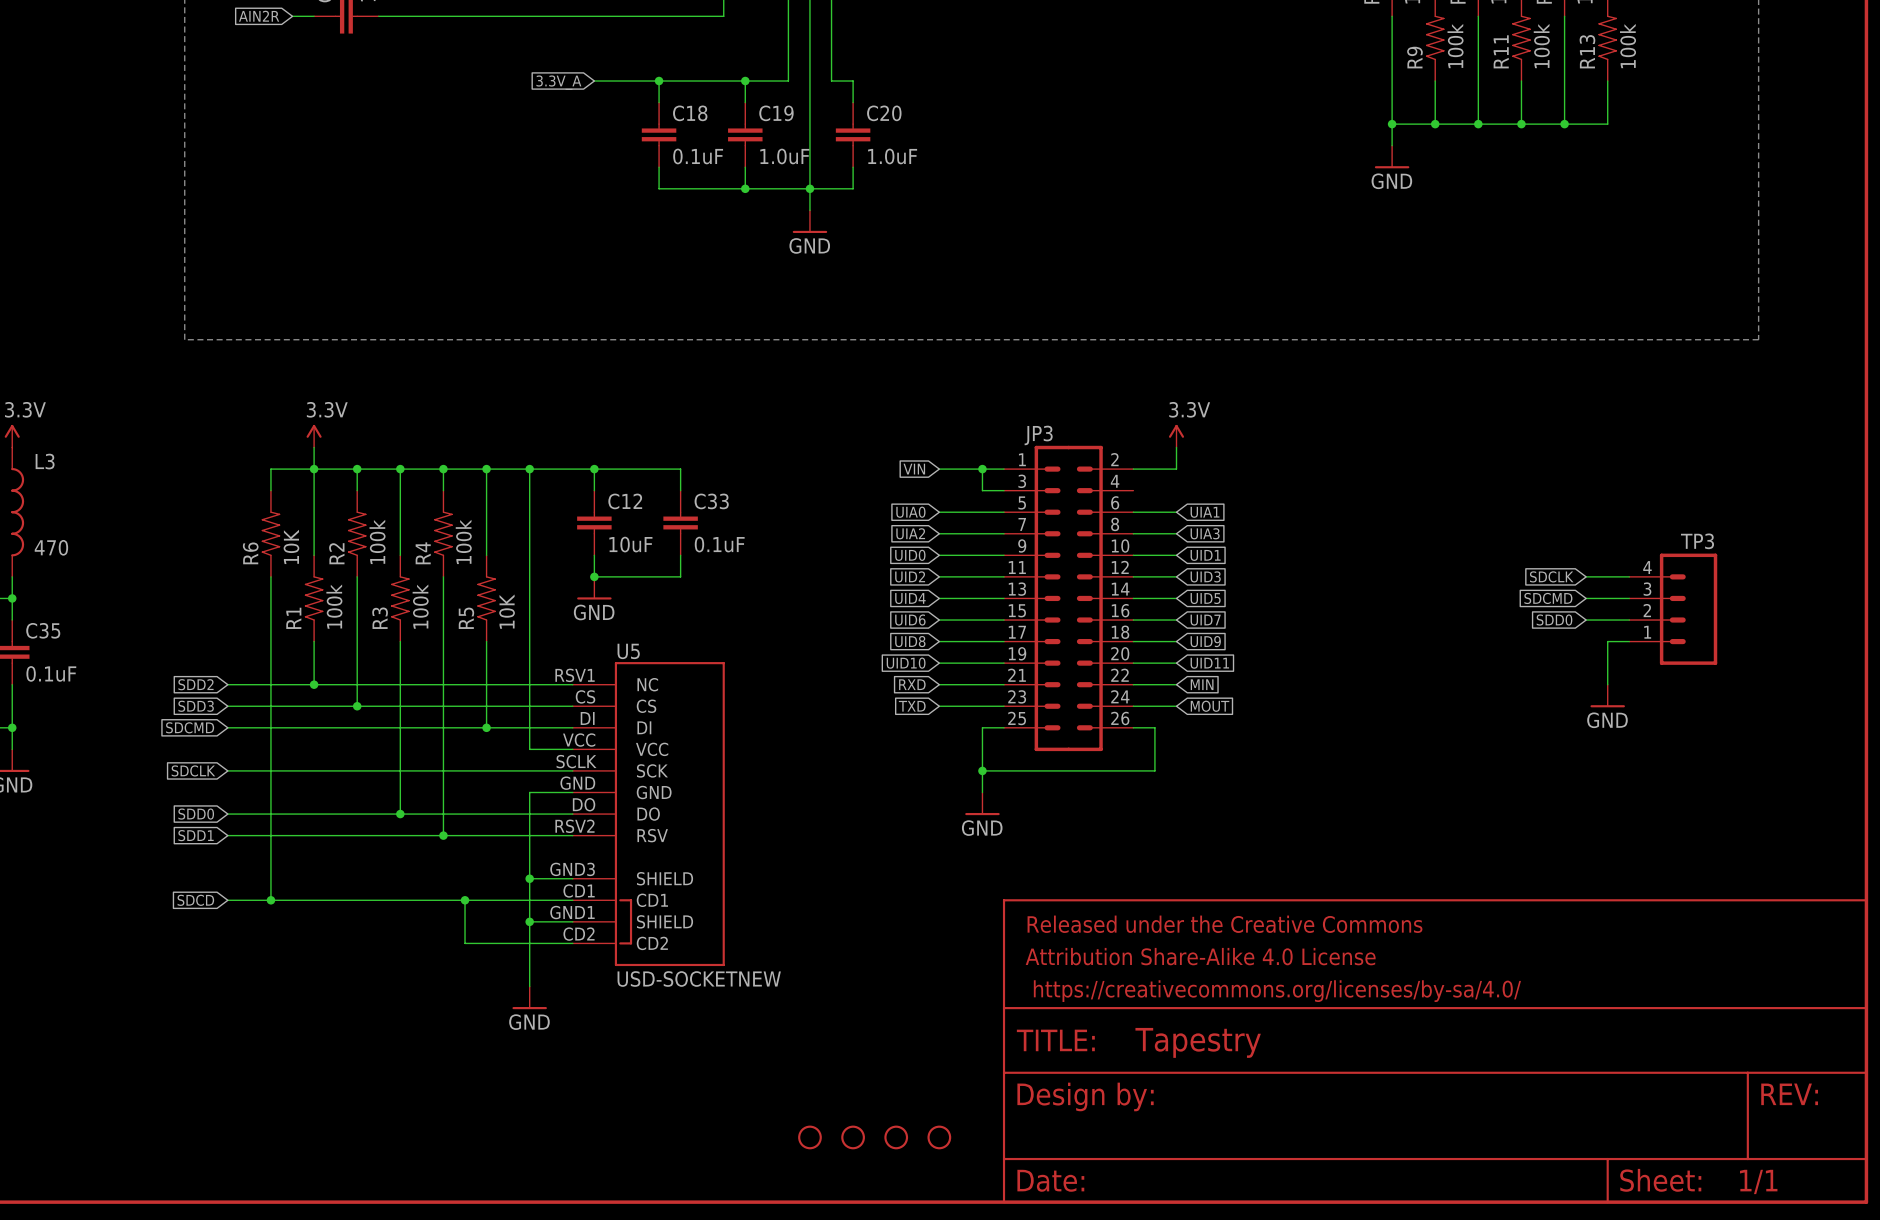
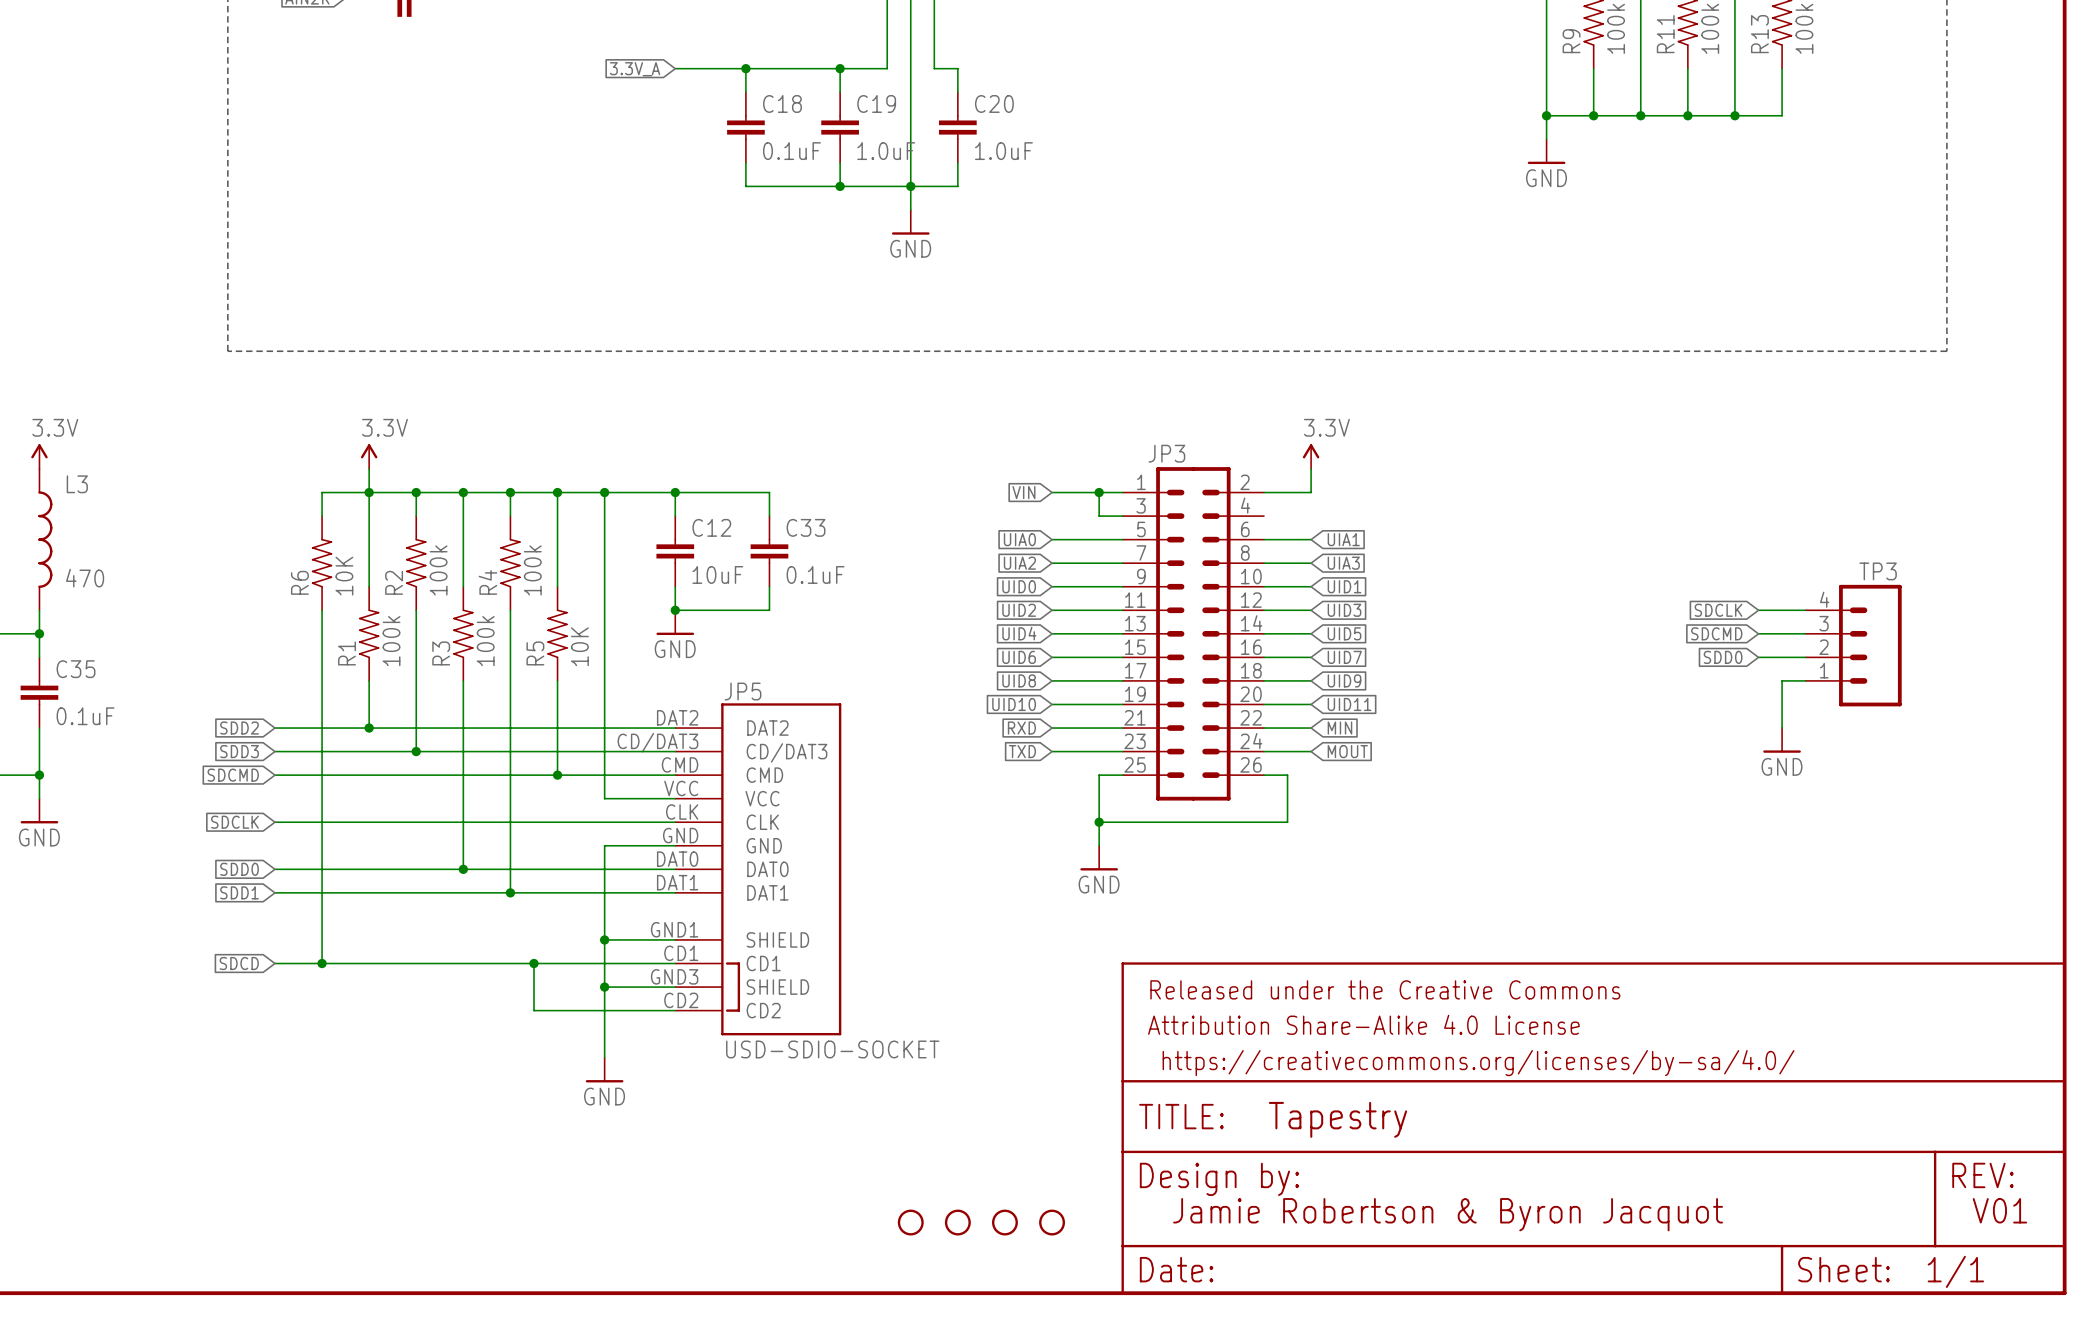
U5: USD-SOCKETNEW (648, 814) -> none
JP5: none -> USD-SDIO-SOCKET (758, 869)
text: none -> V01 (1999, 1210)
text: none -> Jamie Robertson & Byron Jacquot (1448, 1214)

